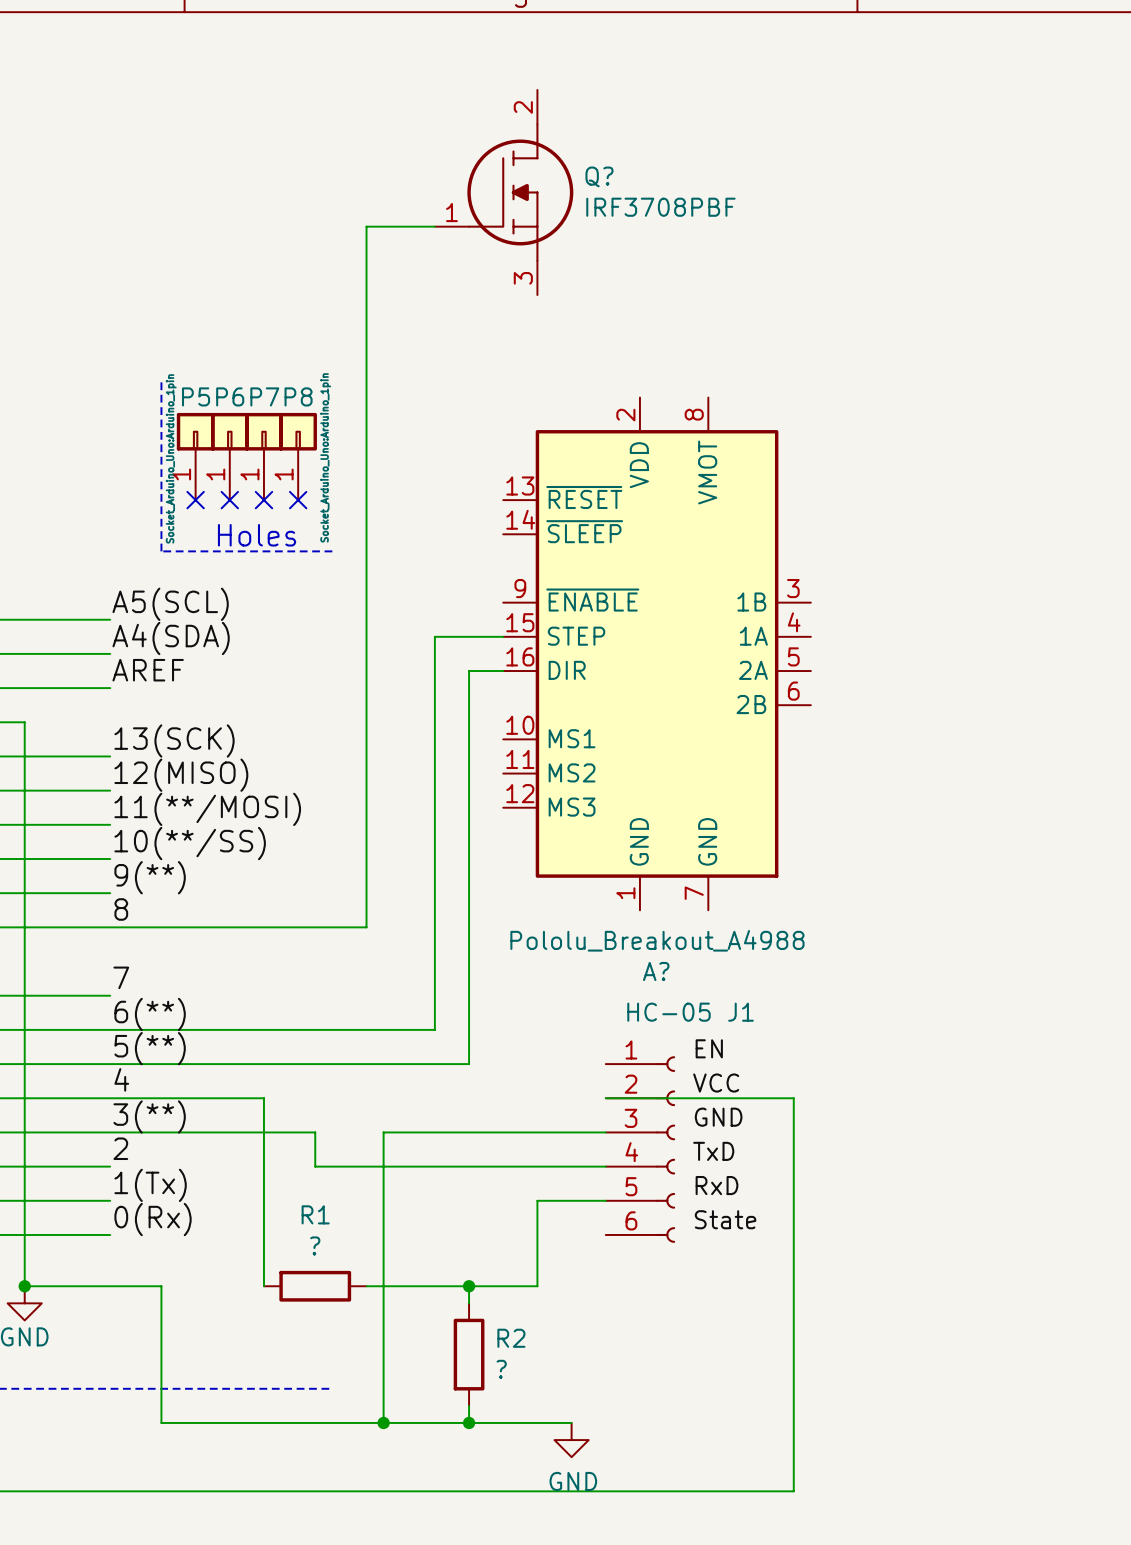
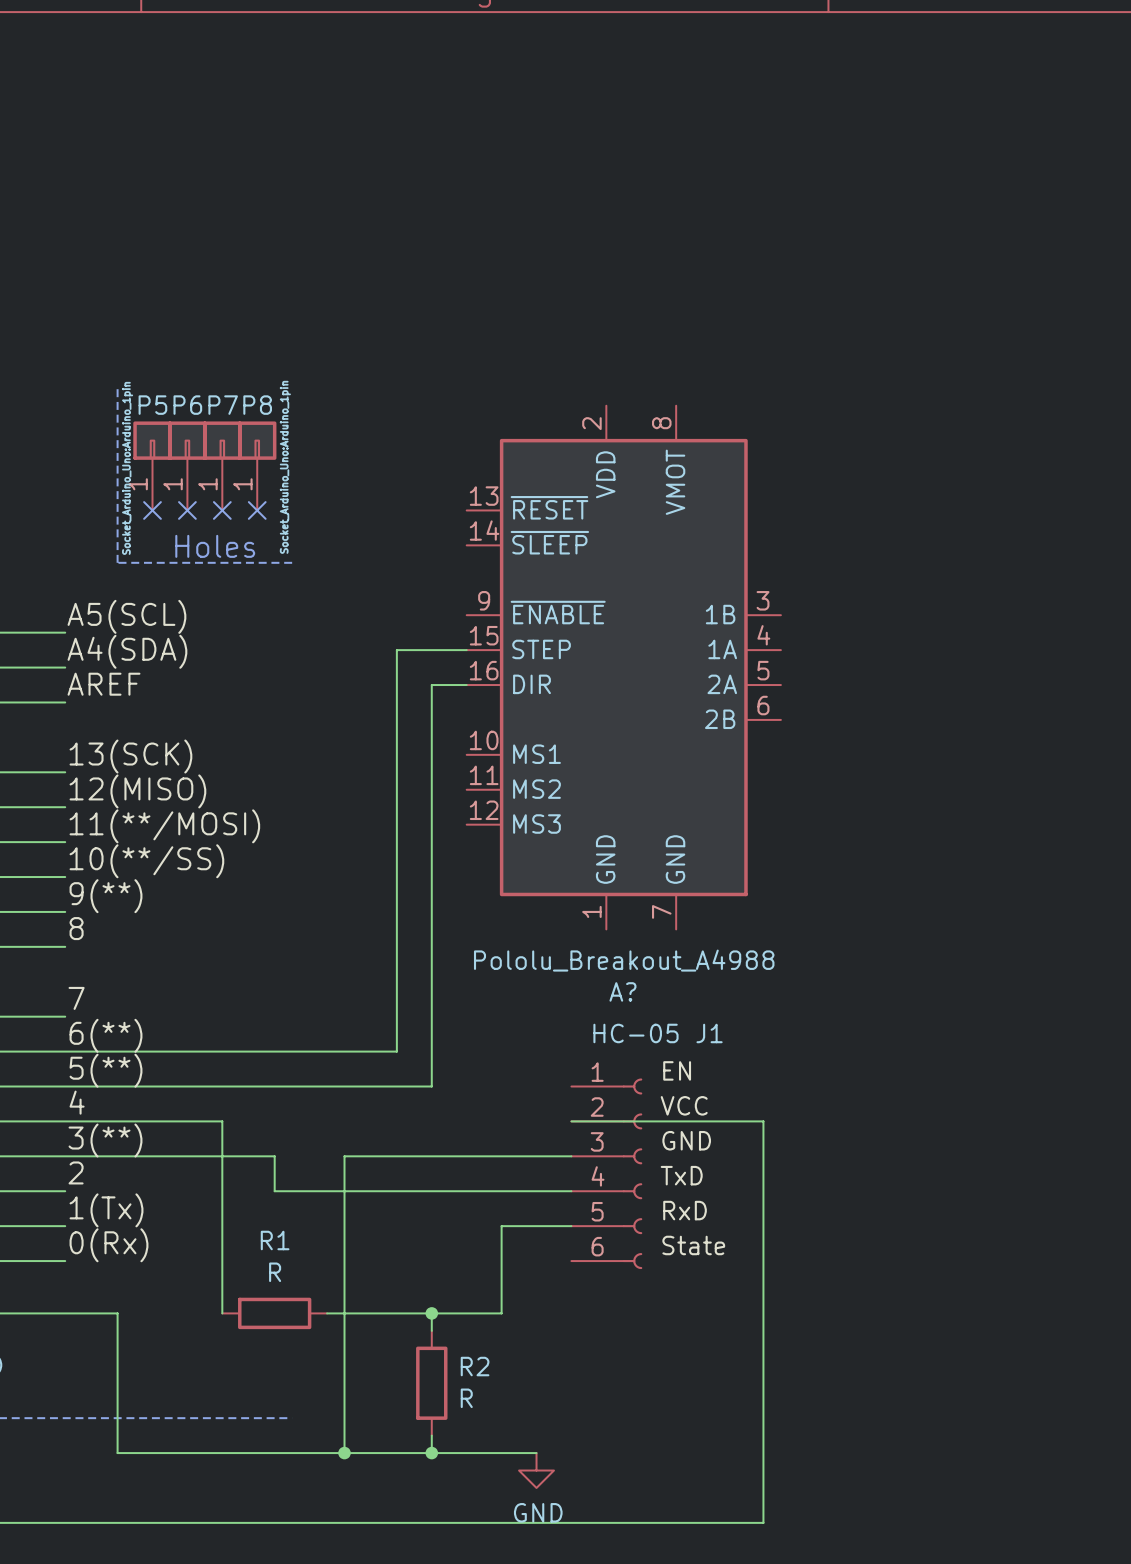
Q?: IRF3708PBF (504, 192) -> none
wire: (434, 226) (366, 226) (366, 927) (110, 927) -> none
R1 value: ? (315, 1245) -> R (275, 1272)
R2 value: ? (501, 1369) -> R (466, 1398)

